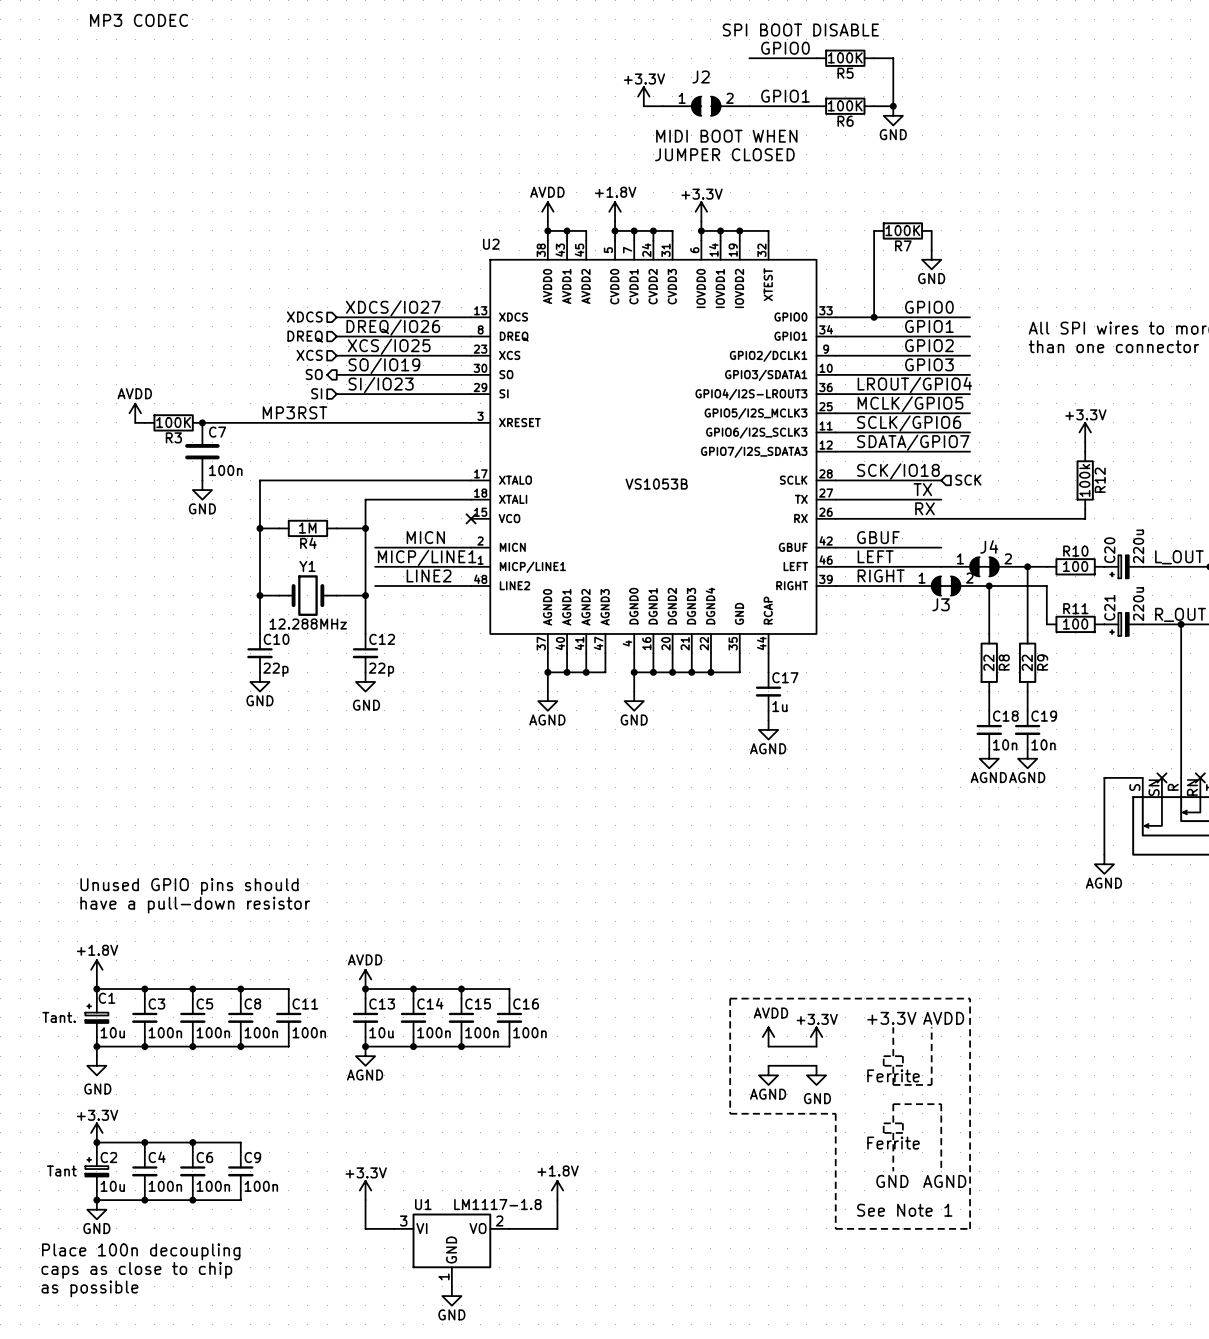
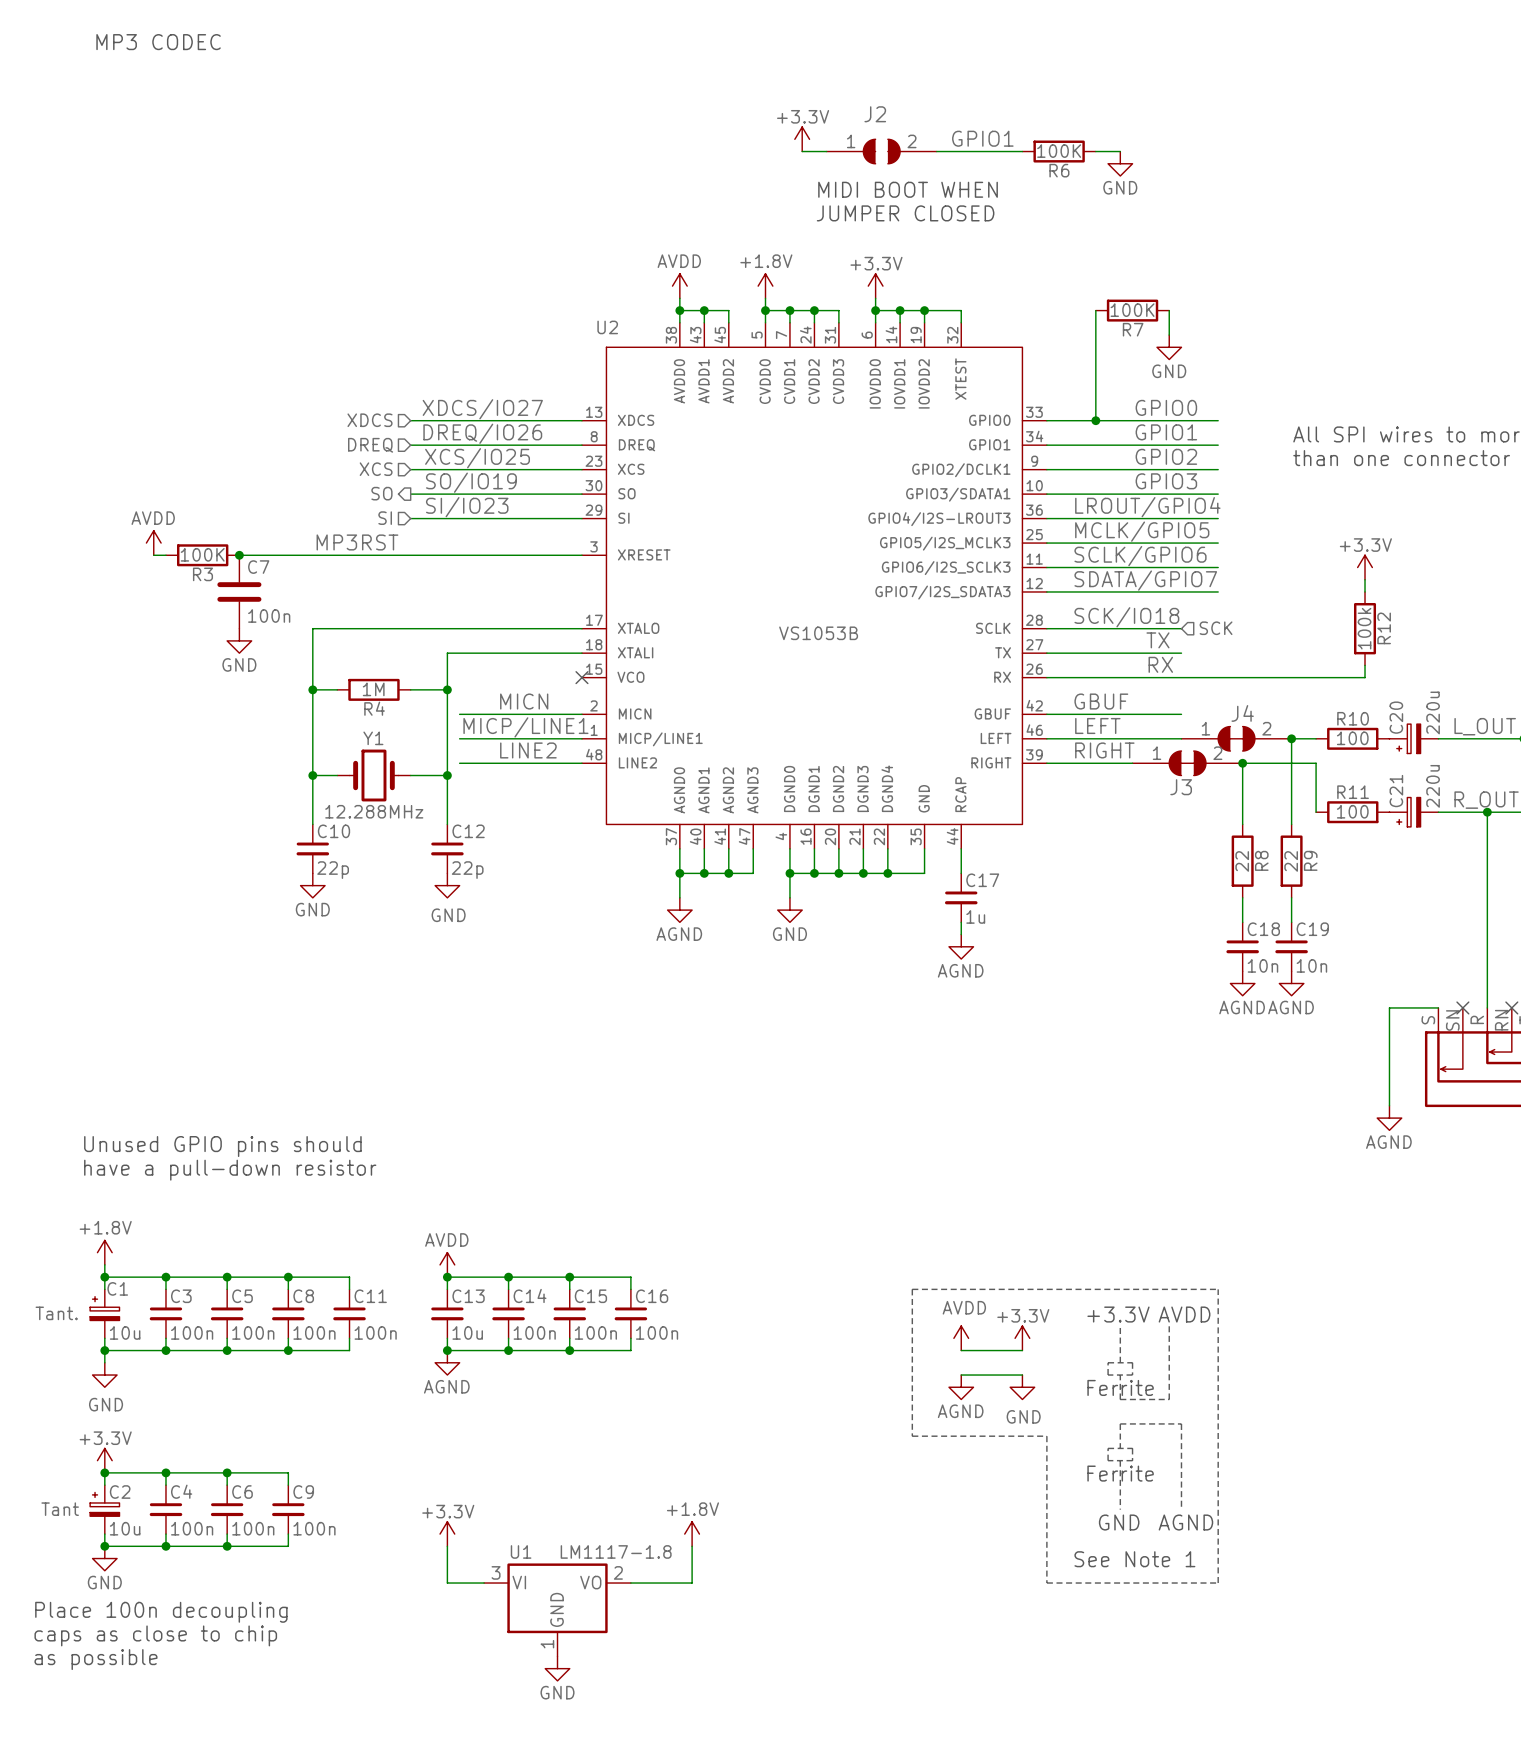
text: SPI BOOT DISABLE (800, 30) -> none
label: GPIO0 (785, 48) -> none
wire: (749, 58) (816, 58) -> none
R5: 100K (845, 58) -> none
wire: (874, 58) (893, 58) (893, 106) -> none
junction: (893, 106) -> none

